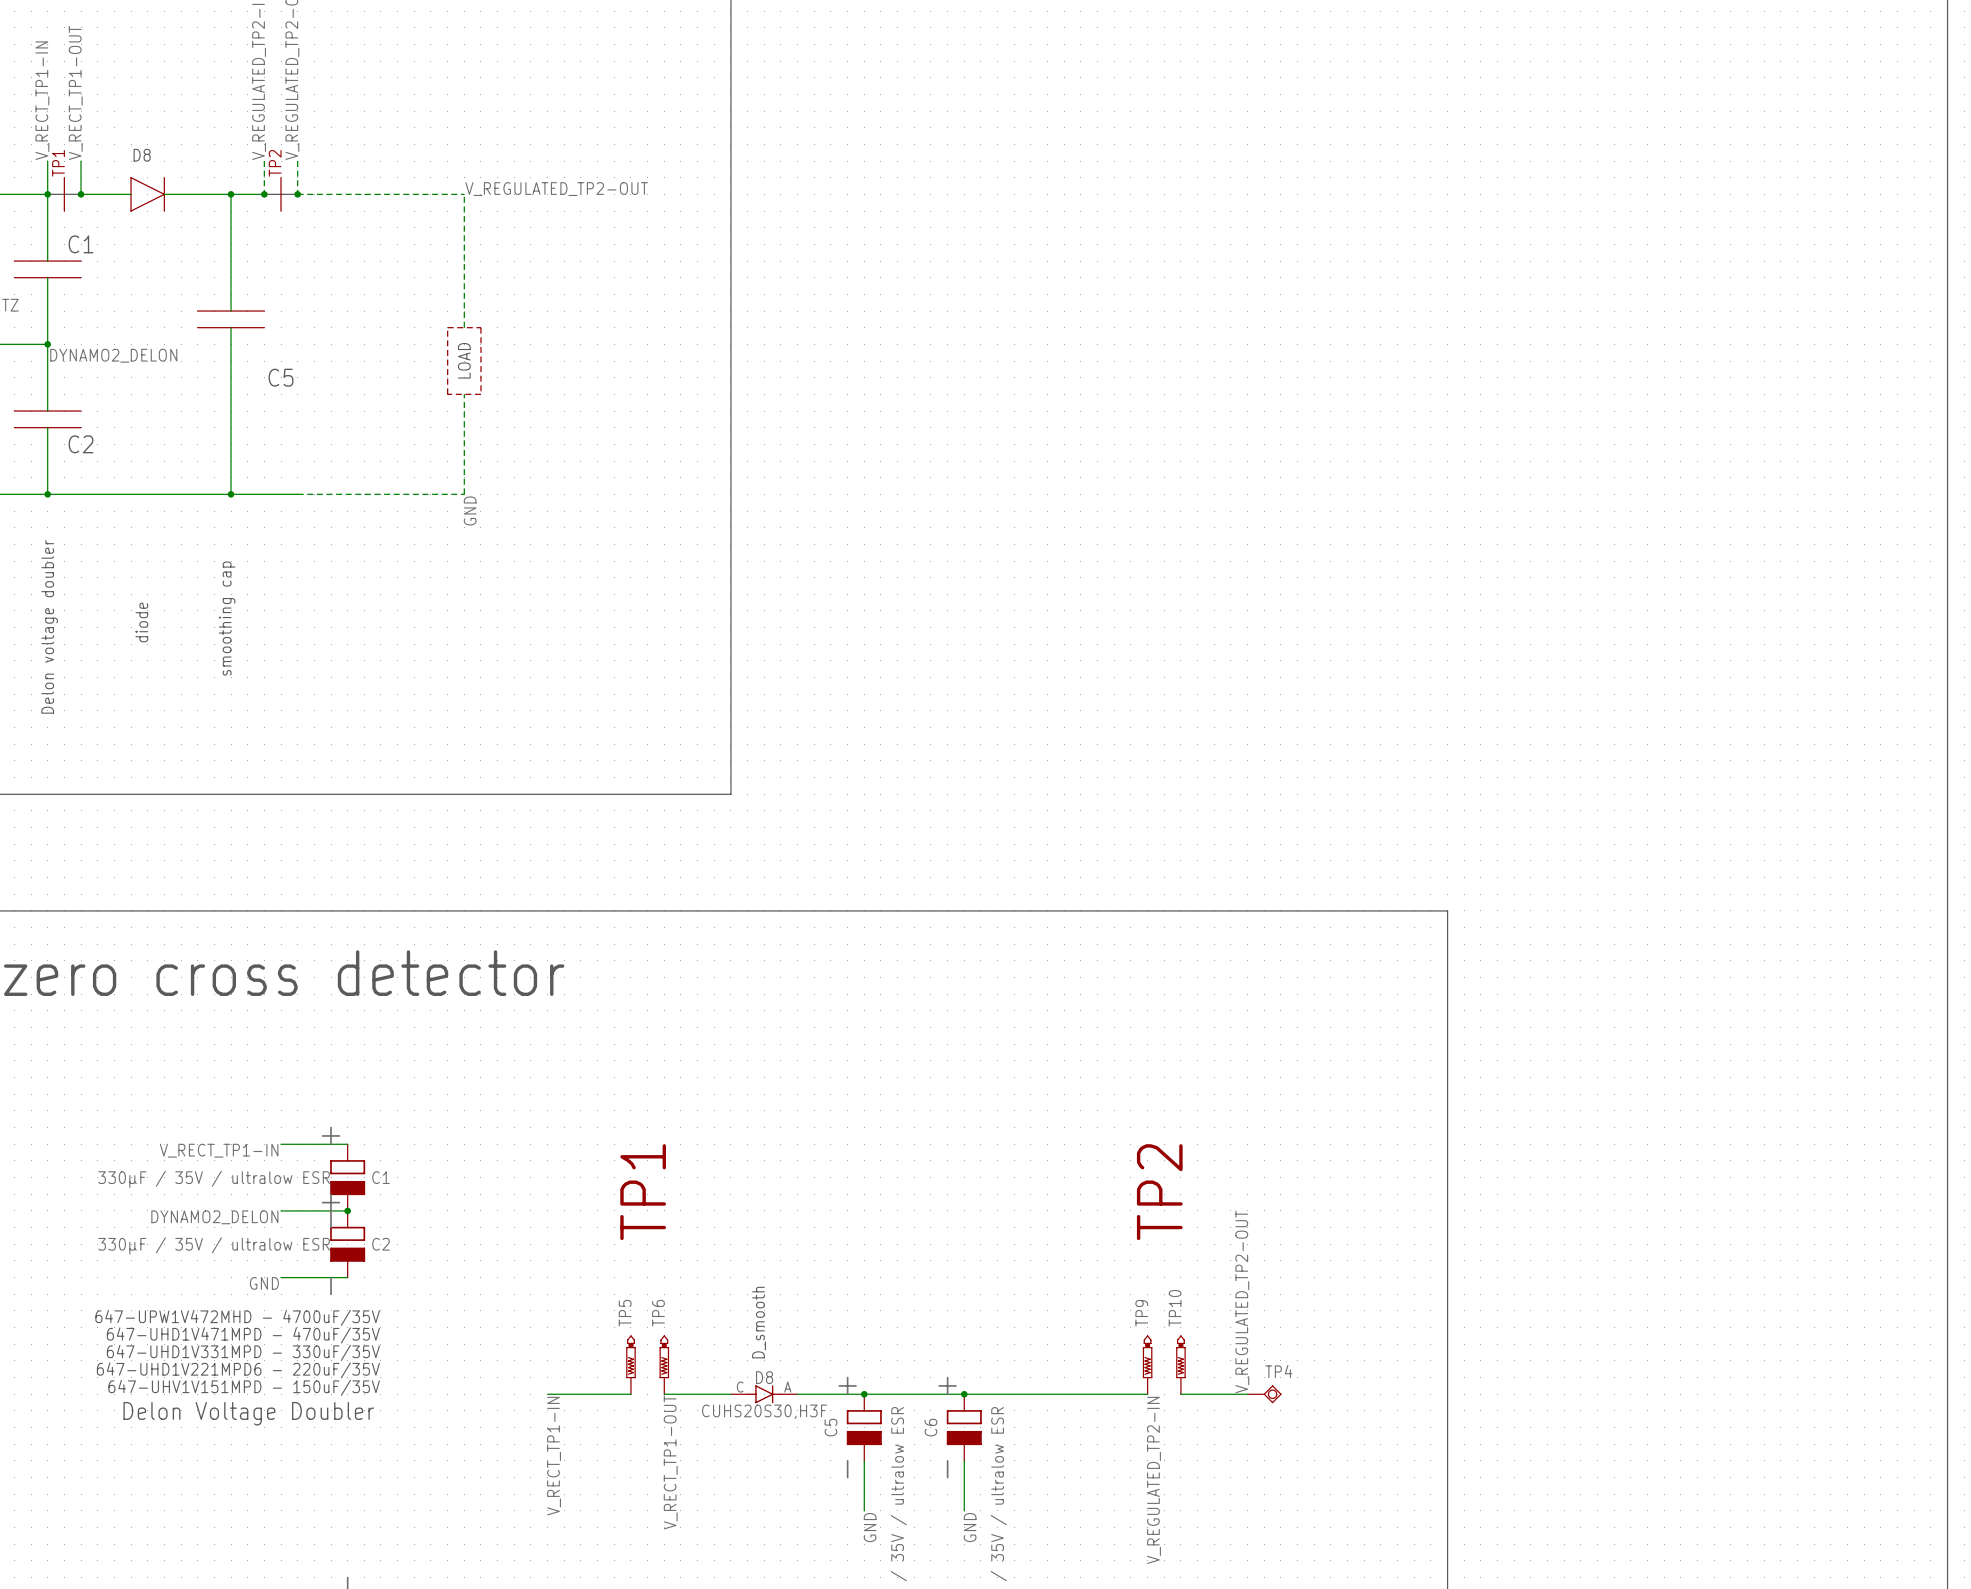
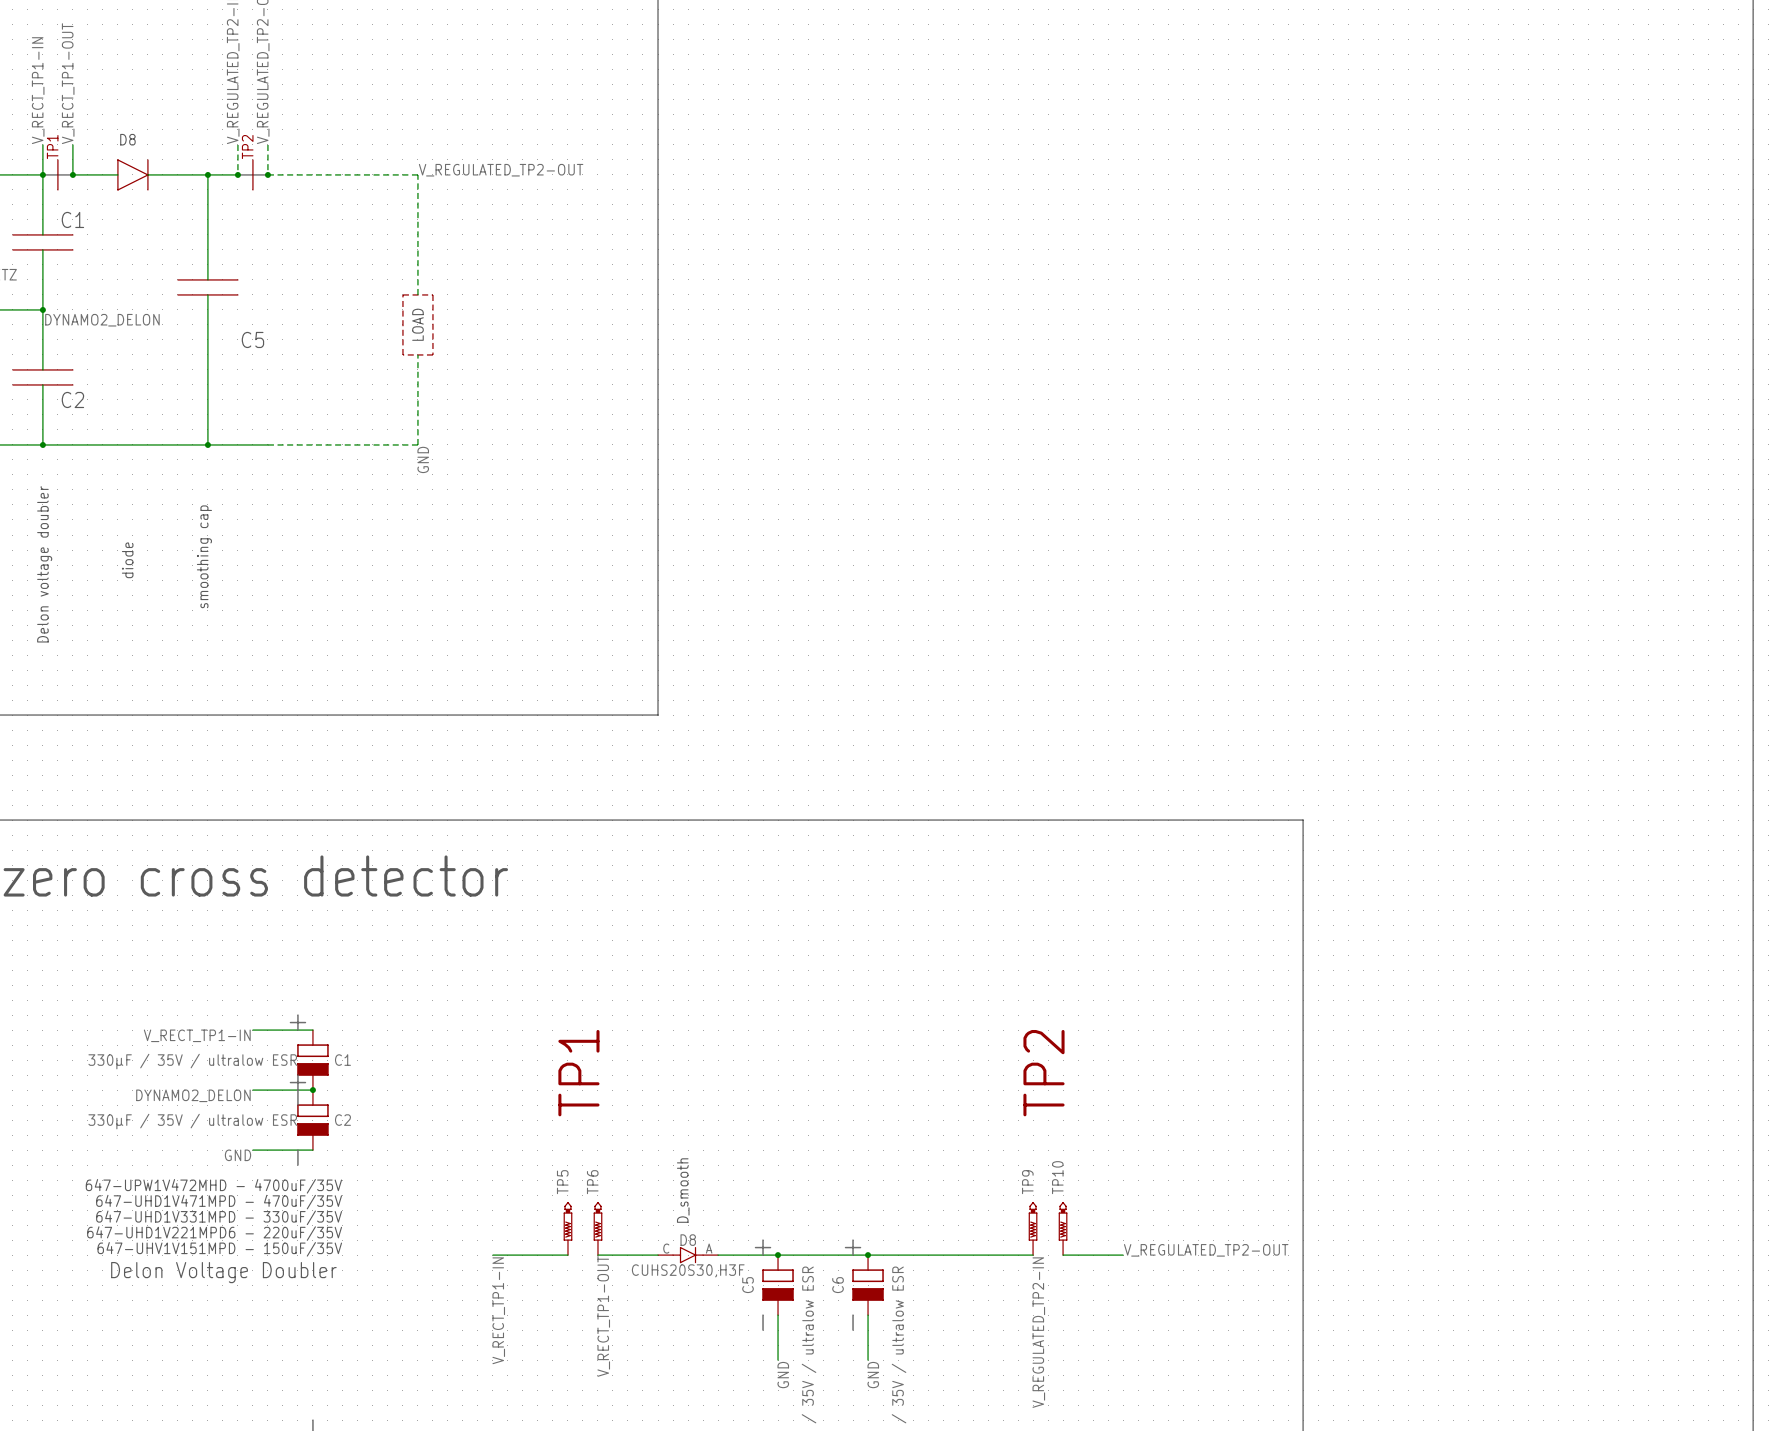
label rotation: 0° (1242, 1301) -> 90° clockwise (1206, 1250)
TP4: (1264, 1394) -> none

